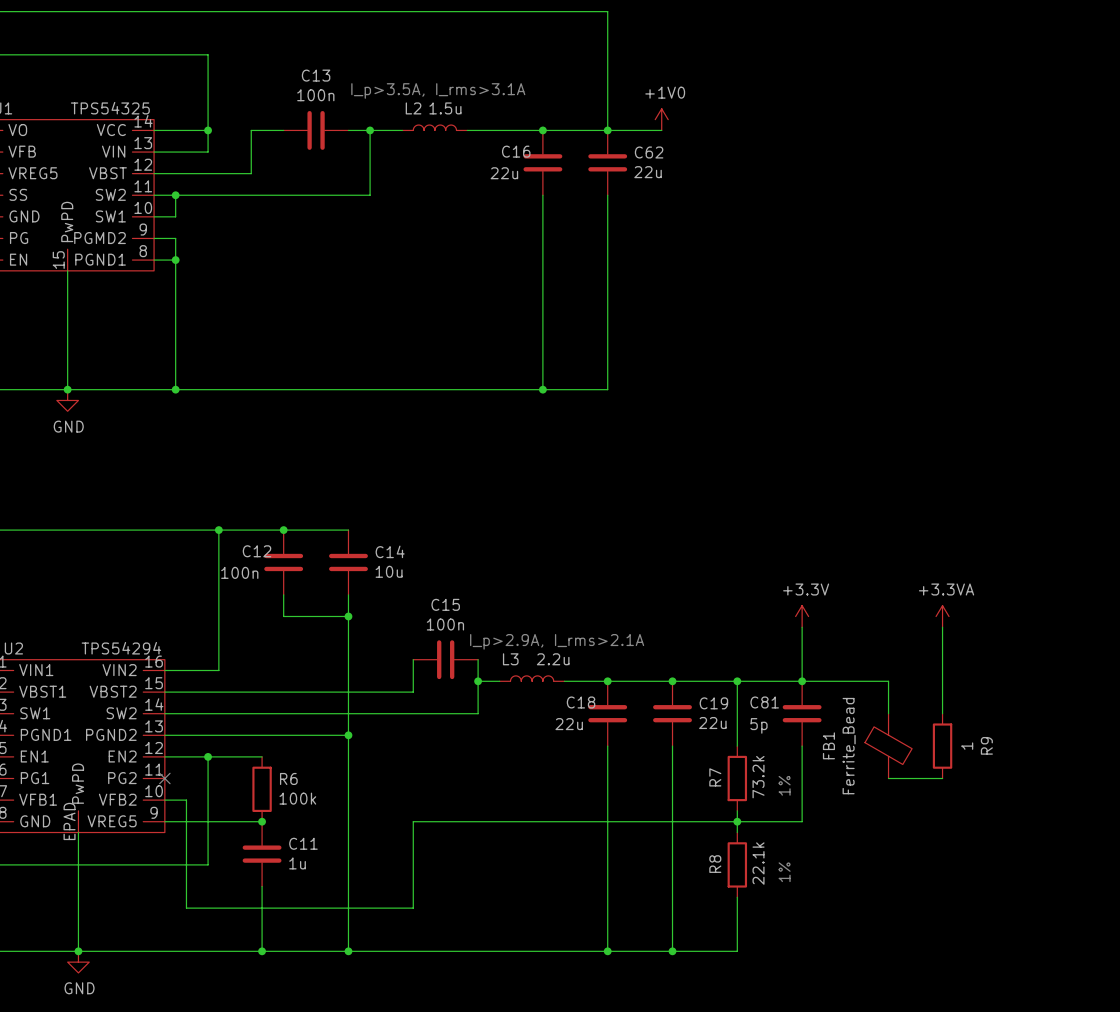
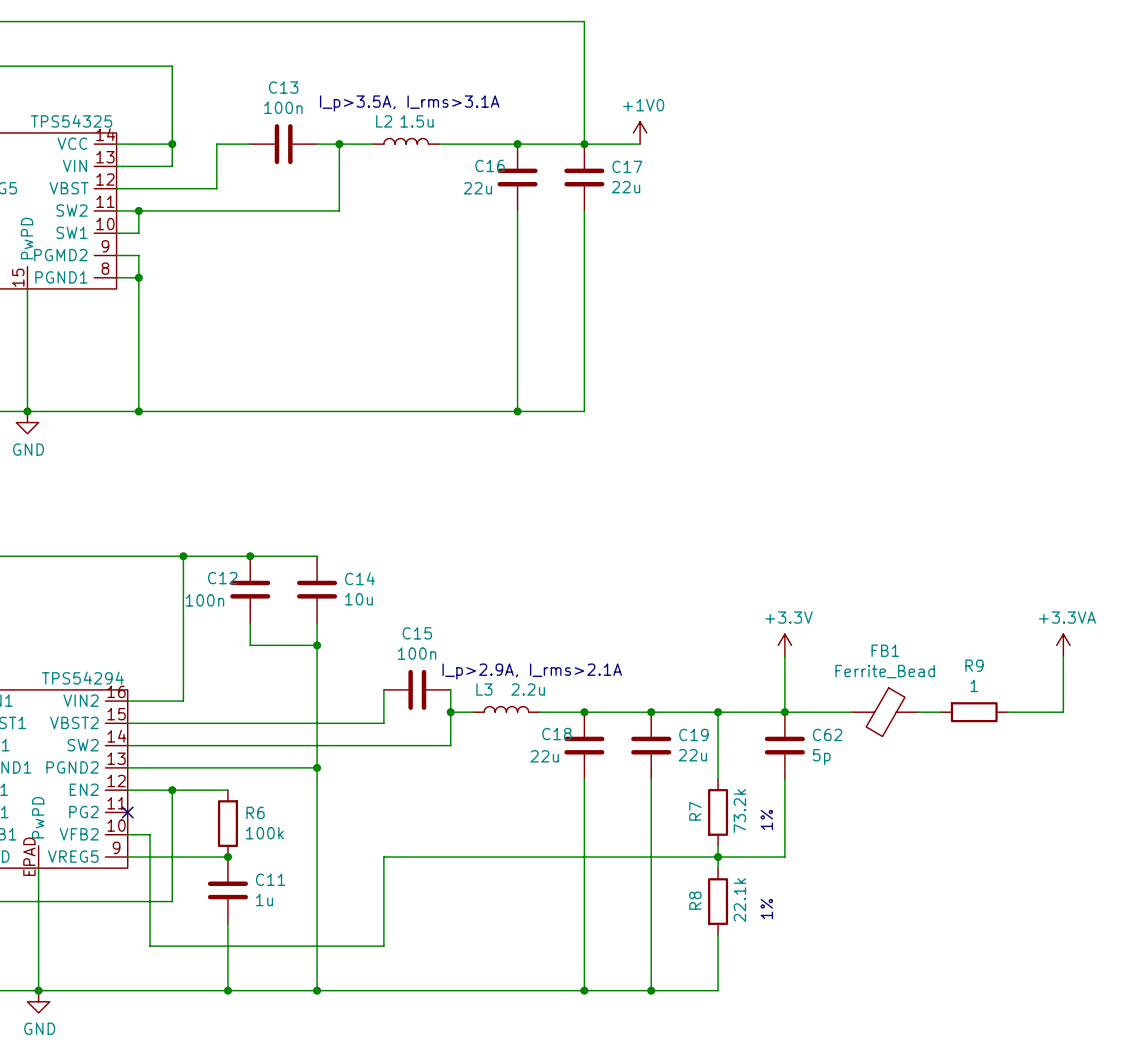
C62 name: C62 (649, 152) -> C17 (627, 166)
power symbol position: +3.3VA (942, 616) -> +3.3VA (1063, 645)
wire: (942, 627) (942, 713) -> none
wire: none -> (1063, 656) (1063, 712) (1007, 712)
wire: (866, 681) (888, 681) (888, 713) -> none
wire: none -> (918, 712) (940, 712)
C81 name: C81 (764, 702) -> C62 (827, 734)
C81 value position: 5p (759, 725) -> 5p (821, 757)
FB1 rotation: 0° (888, 745) -> 90° clockwise (885, 712)
R9 name position: R9 (986, 745) -> R9 (974, 665)
FB1 position: (888, 746) -> (885, 712)
R9 rotation: 0° (942, 746) -> 90° clockwise (974, 712)
R9 position: (942, 746) -> (974, 712)
R9 value position: 1 (967, 746) -> 1 (974, 685)
wire: (888, 778) (942, 778) -> none

